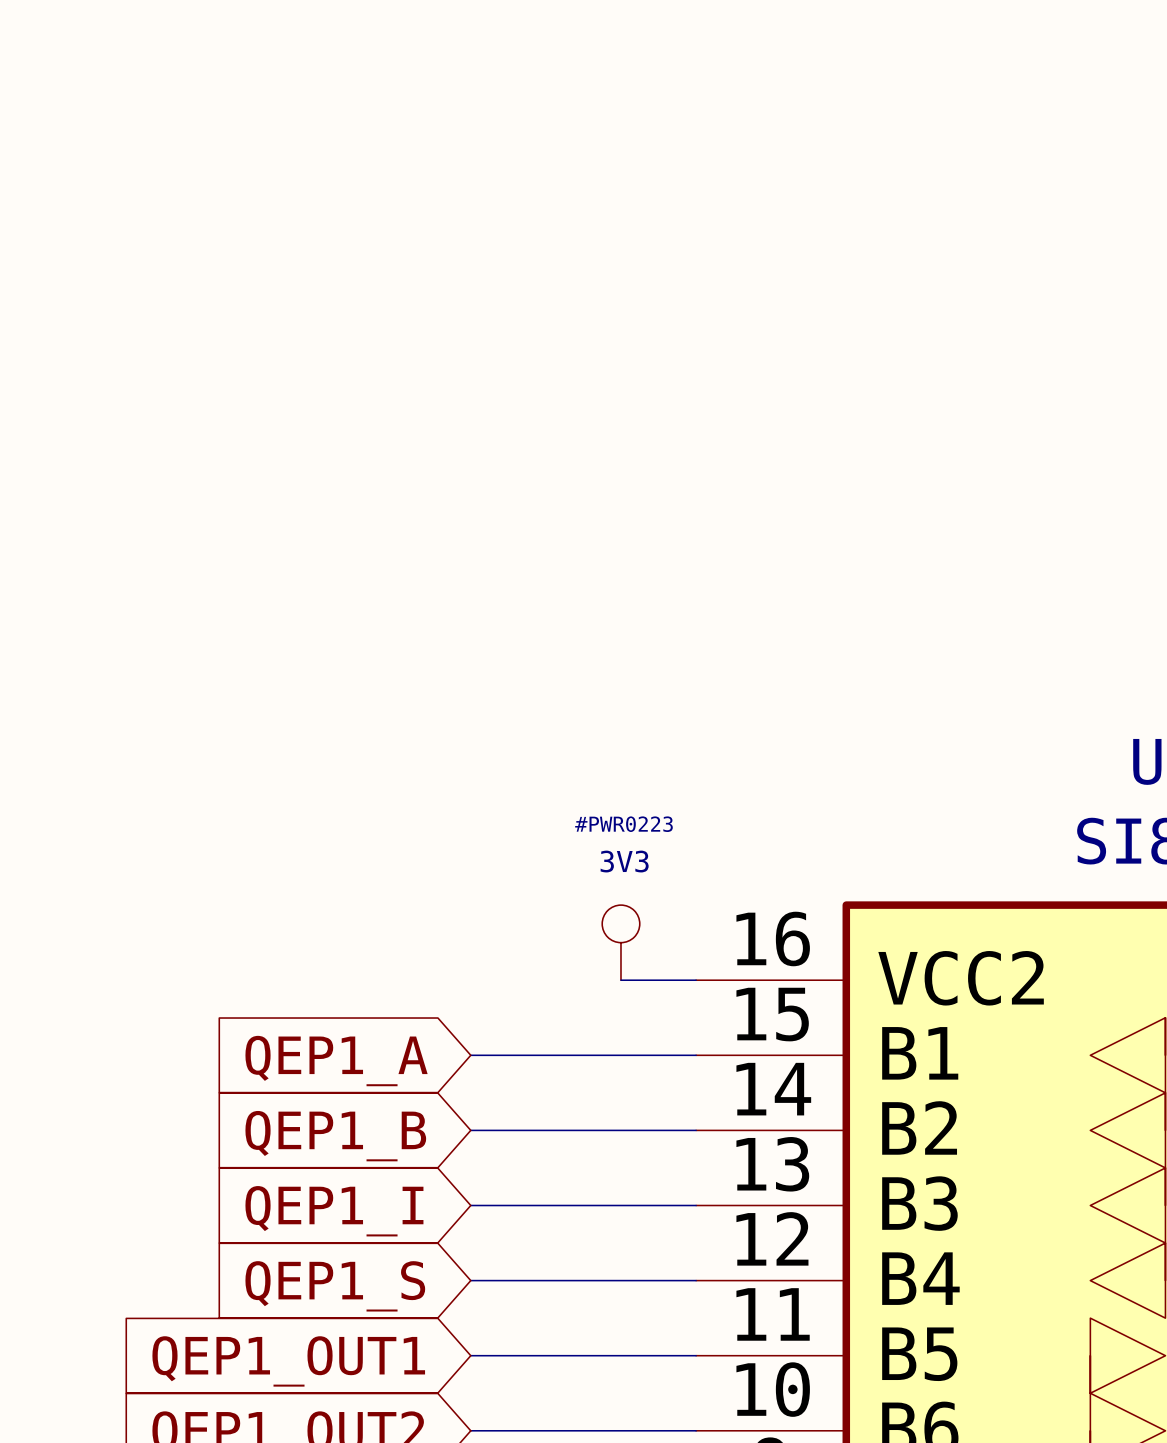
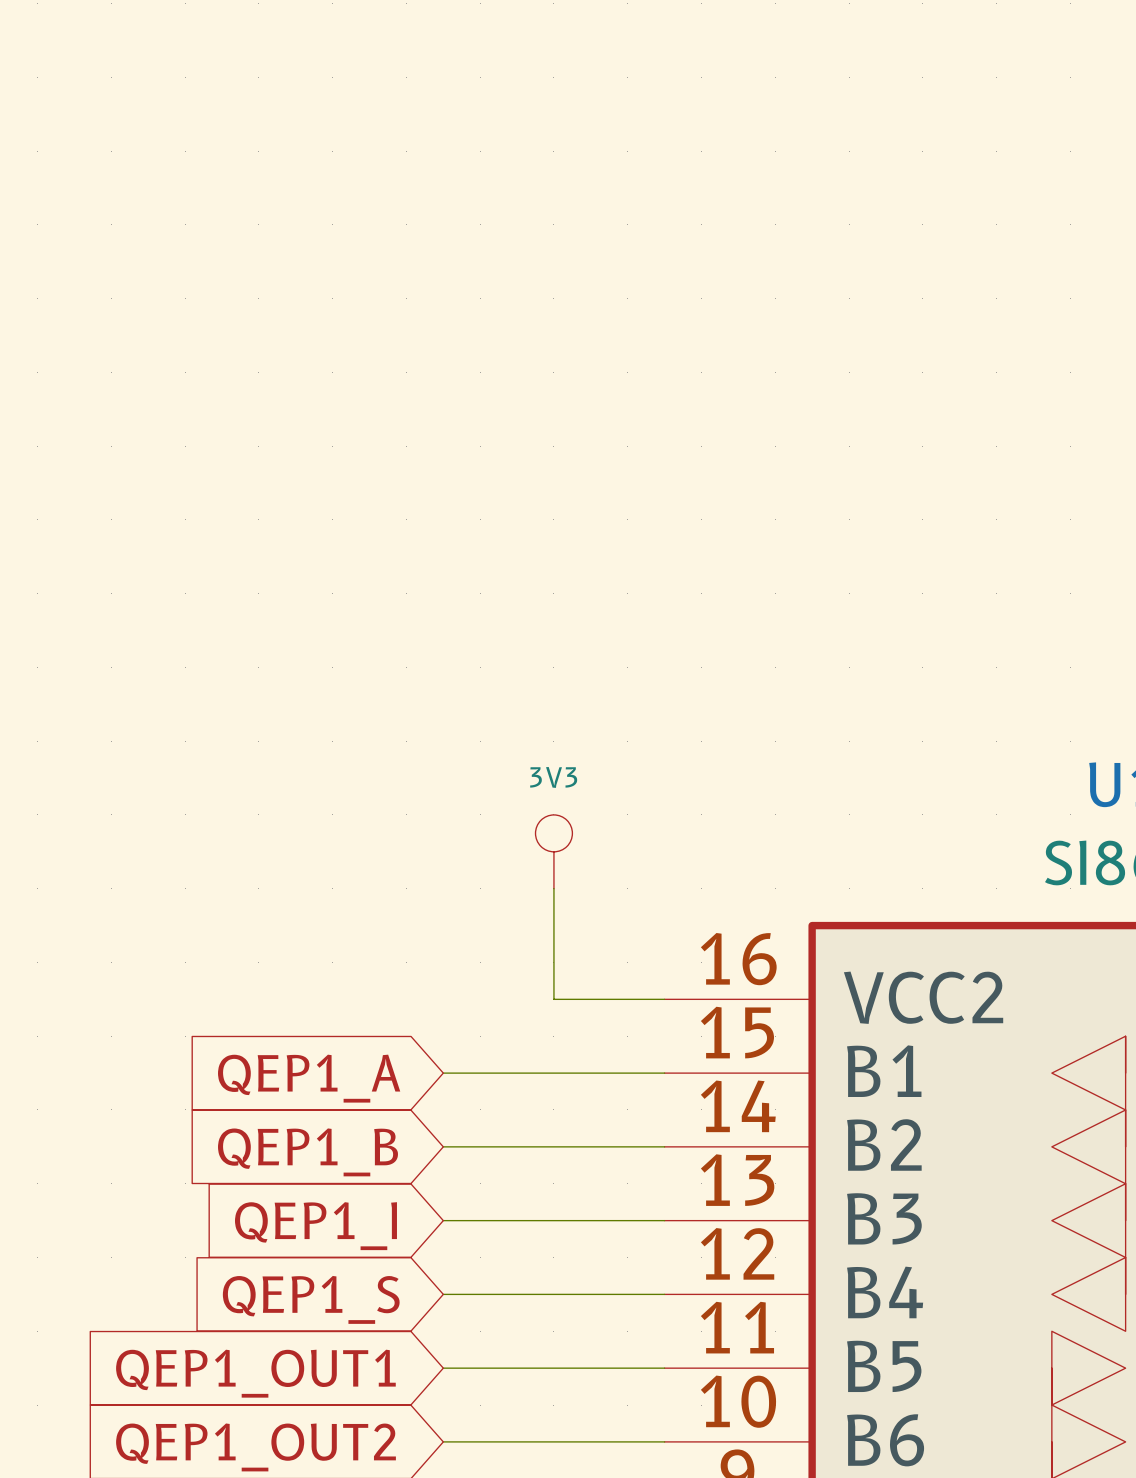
power symbol: none -> 3V3 (553, 851)
wire: none -> (553, 888) (553, 999) (590, 999)
#PWR0223: 3V3 (620, 942) -> none

